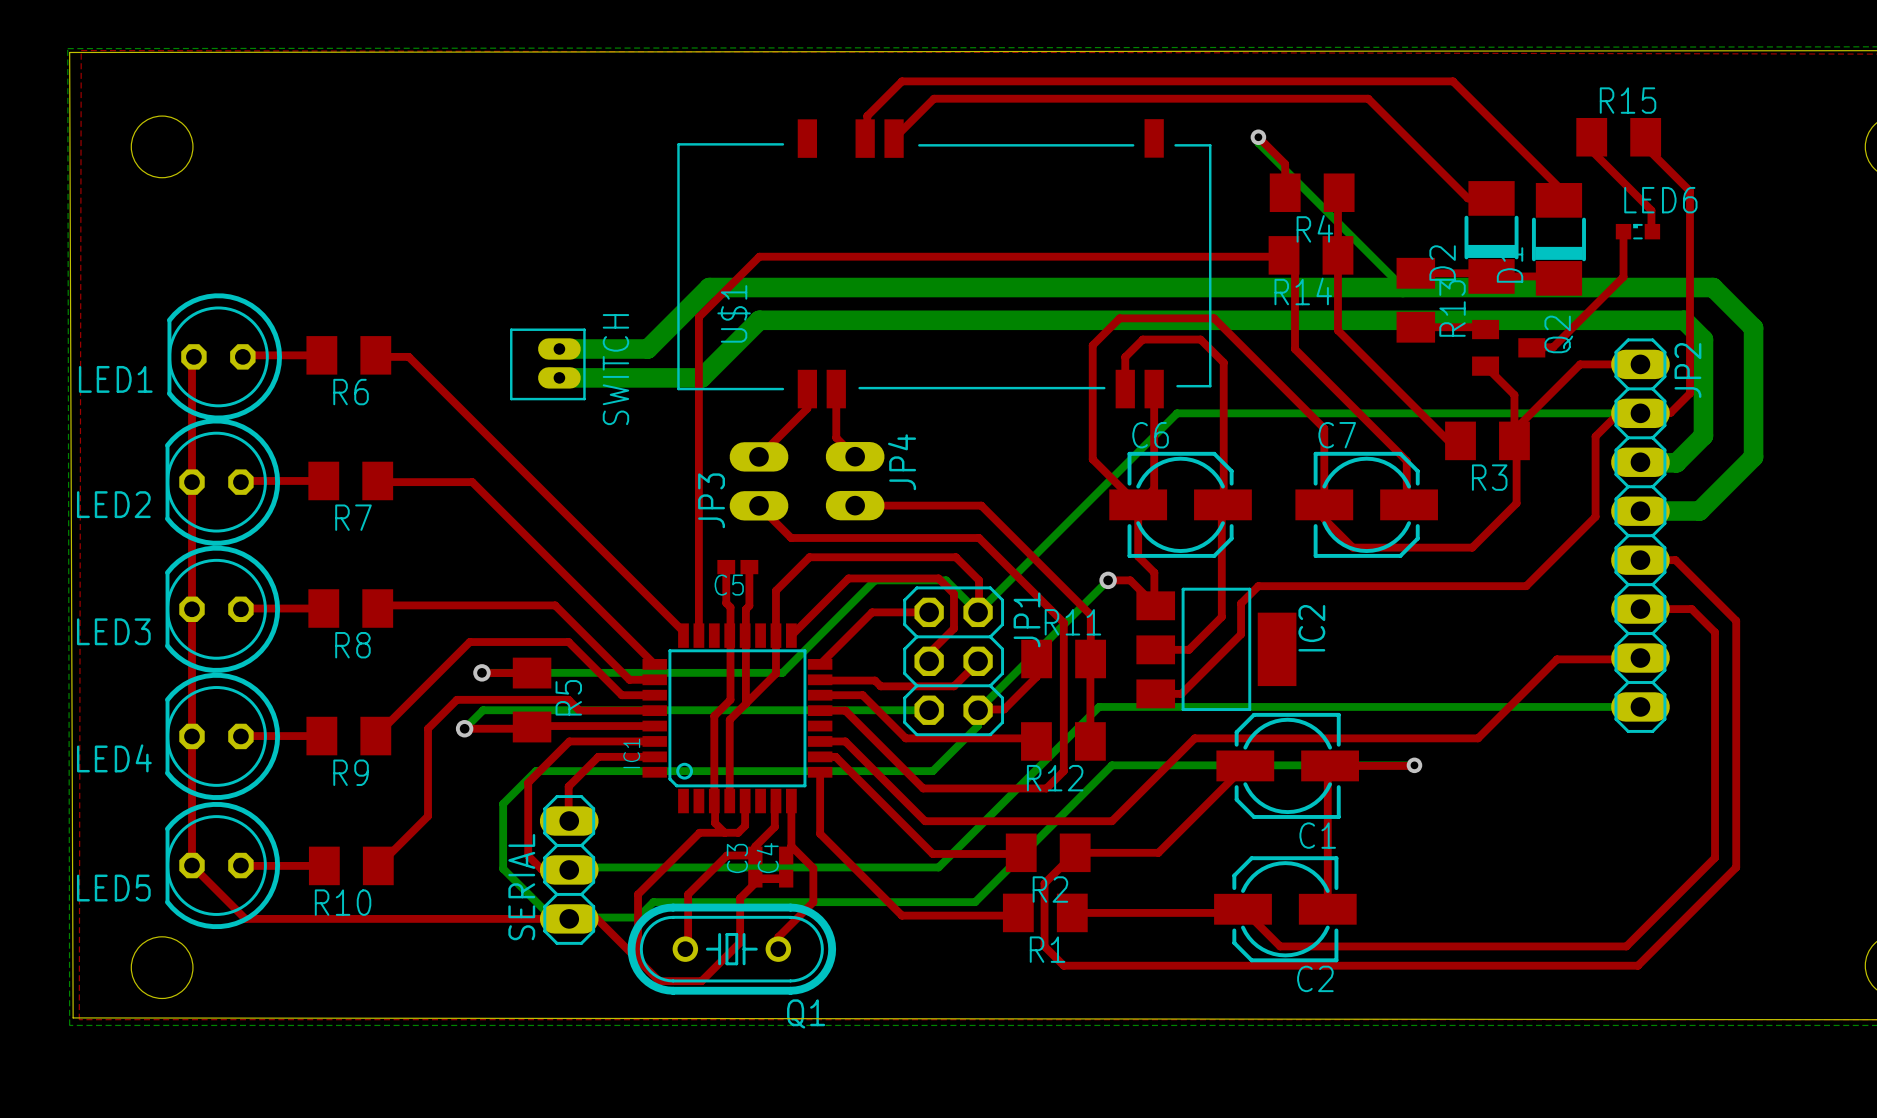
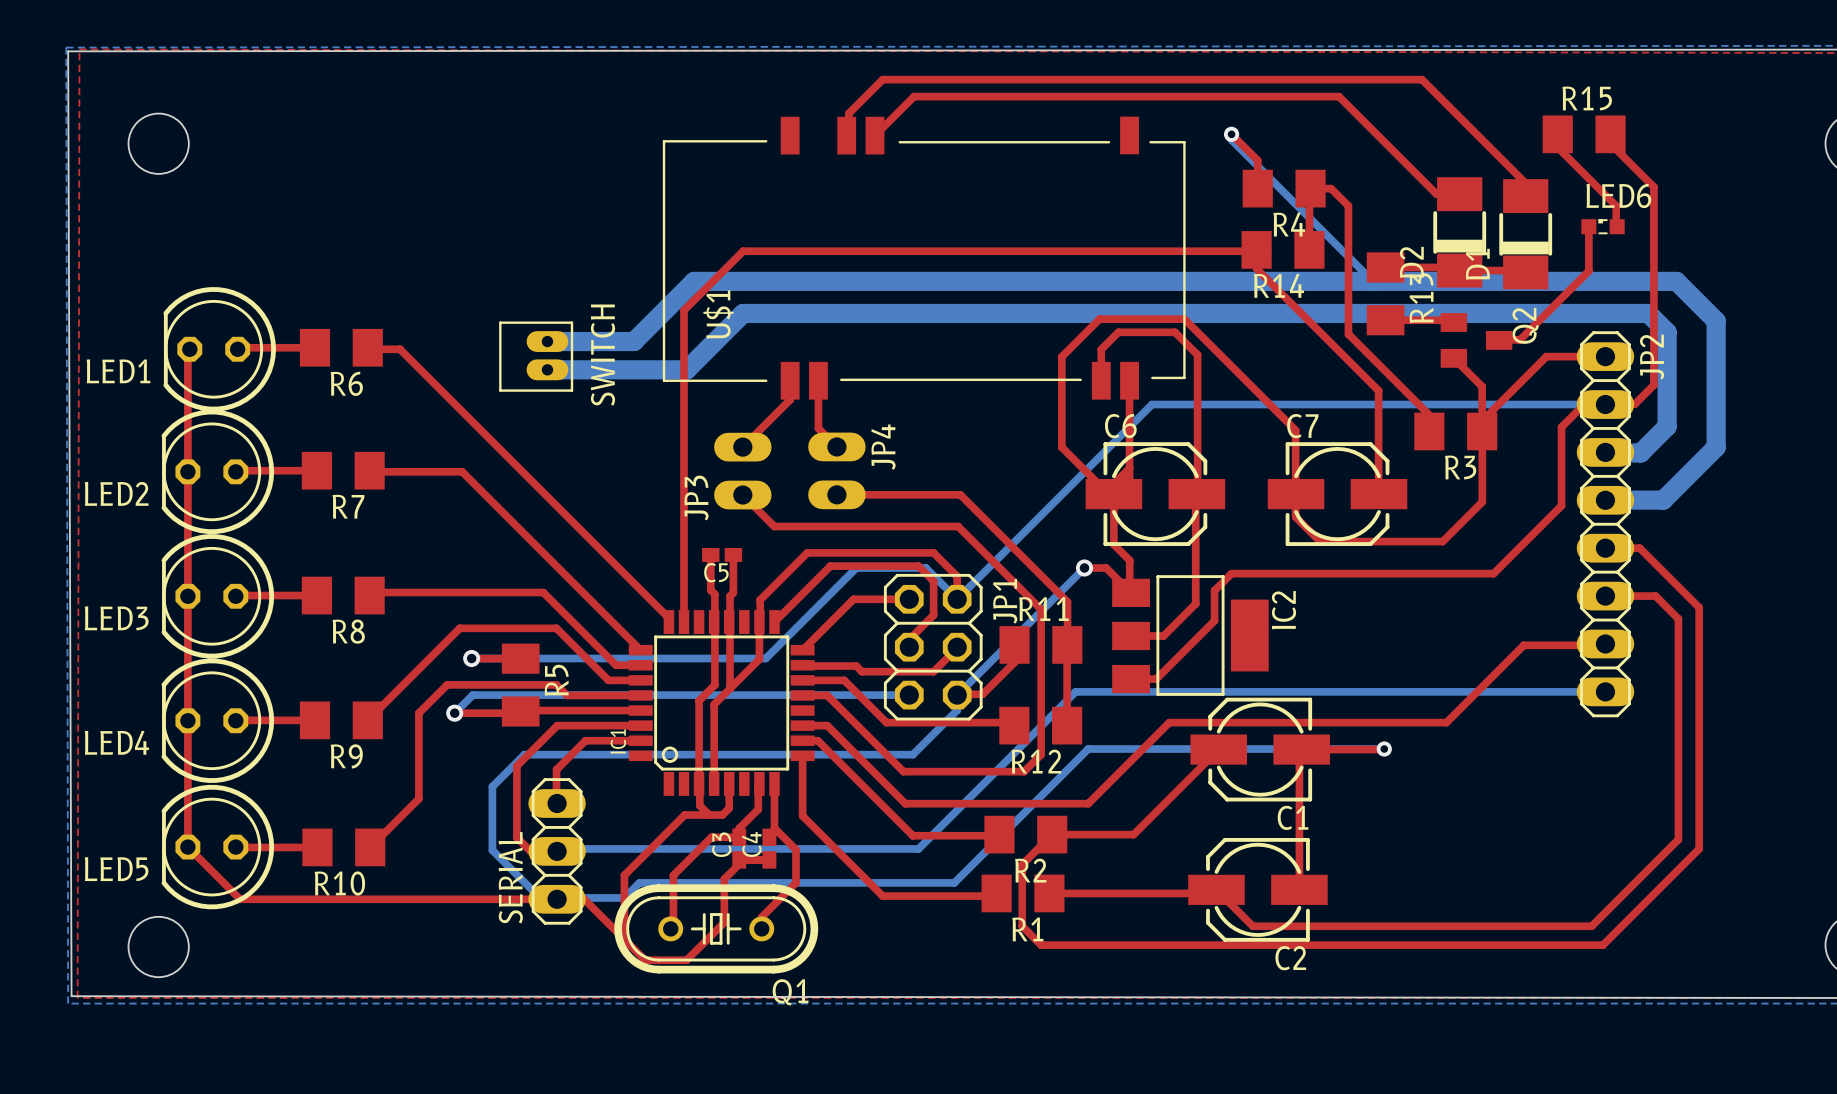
top track: (1337, 255) (1337, 330) (1449, 441) (1460, 440) -> (1310, 188) (1331, 188) (1348, 205) (1348, 334) (1429, 415) (1429, 431)
top track: (1295, 258) (1295, 349) (1406, 460) (1406, 502) (1408, 504) -> (1256, 249) (1256, 268) (1378, 390) (1378, 493)
top track: (1514, 441) (1516, 443) (1516, 503) (1472, 547) (1352, 547) (1324, 519) (1324, 428) (1214, 318) (1119, 318) (1092, 345) (1092, 459) (1138, 504) -> (1482, 431) (1482, 502) (1442, 541) (1320, 541) (1295, 517) (1295, 430) (1184, 319) (1099, 319) (1061, 356) (1061, 447) (1099, 485) (1112, 485) (1129, 468)
top track: (978, 612) (979, 580) (955, 557) (809, 557) (775, 590) (775, 635) -> (957, 599) (957, 576) (933, 552) (807, 552) (760, 600) (759, 622)

